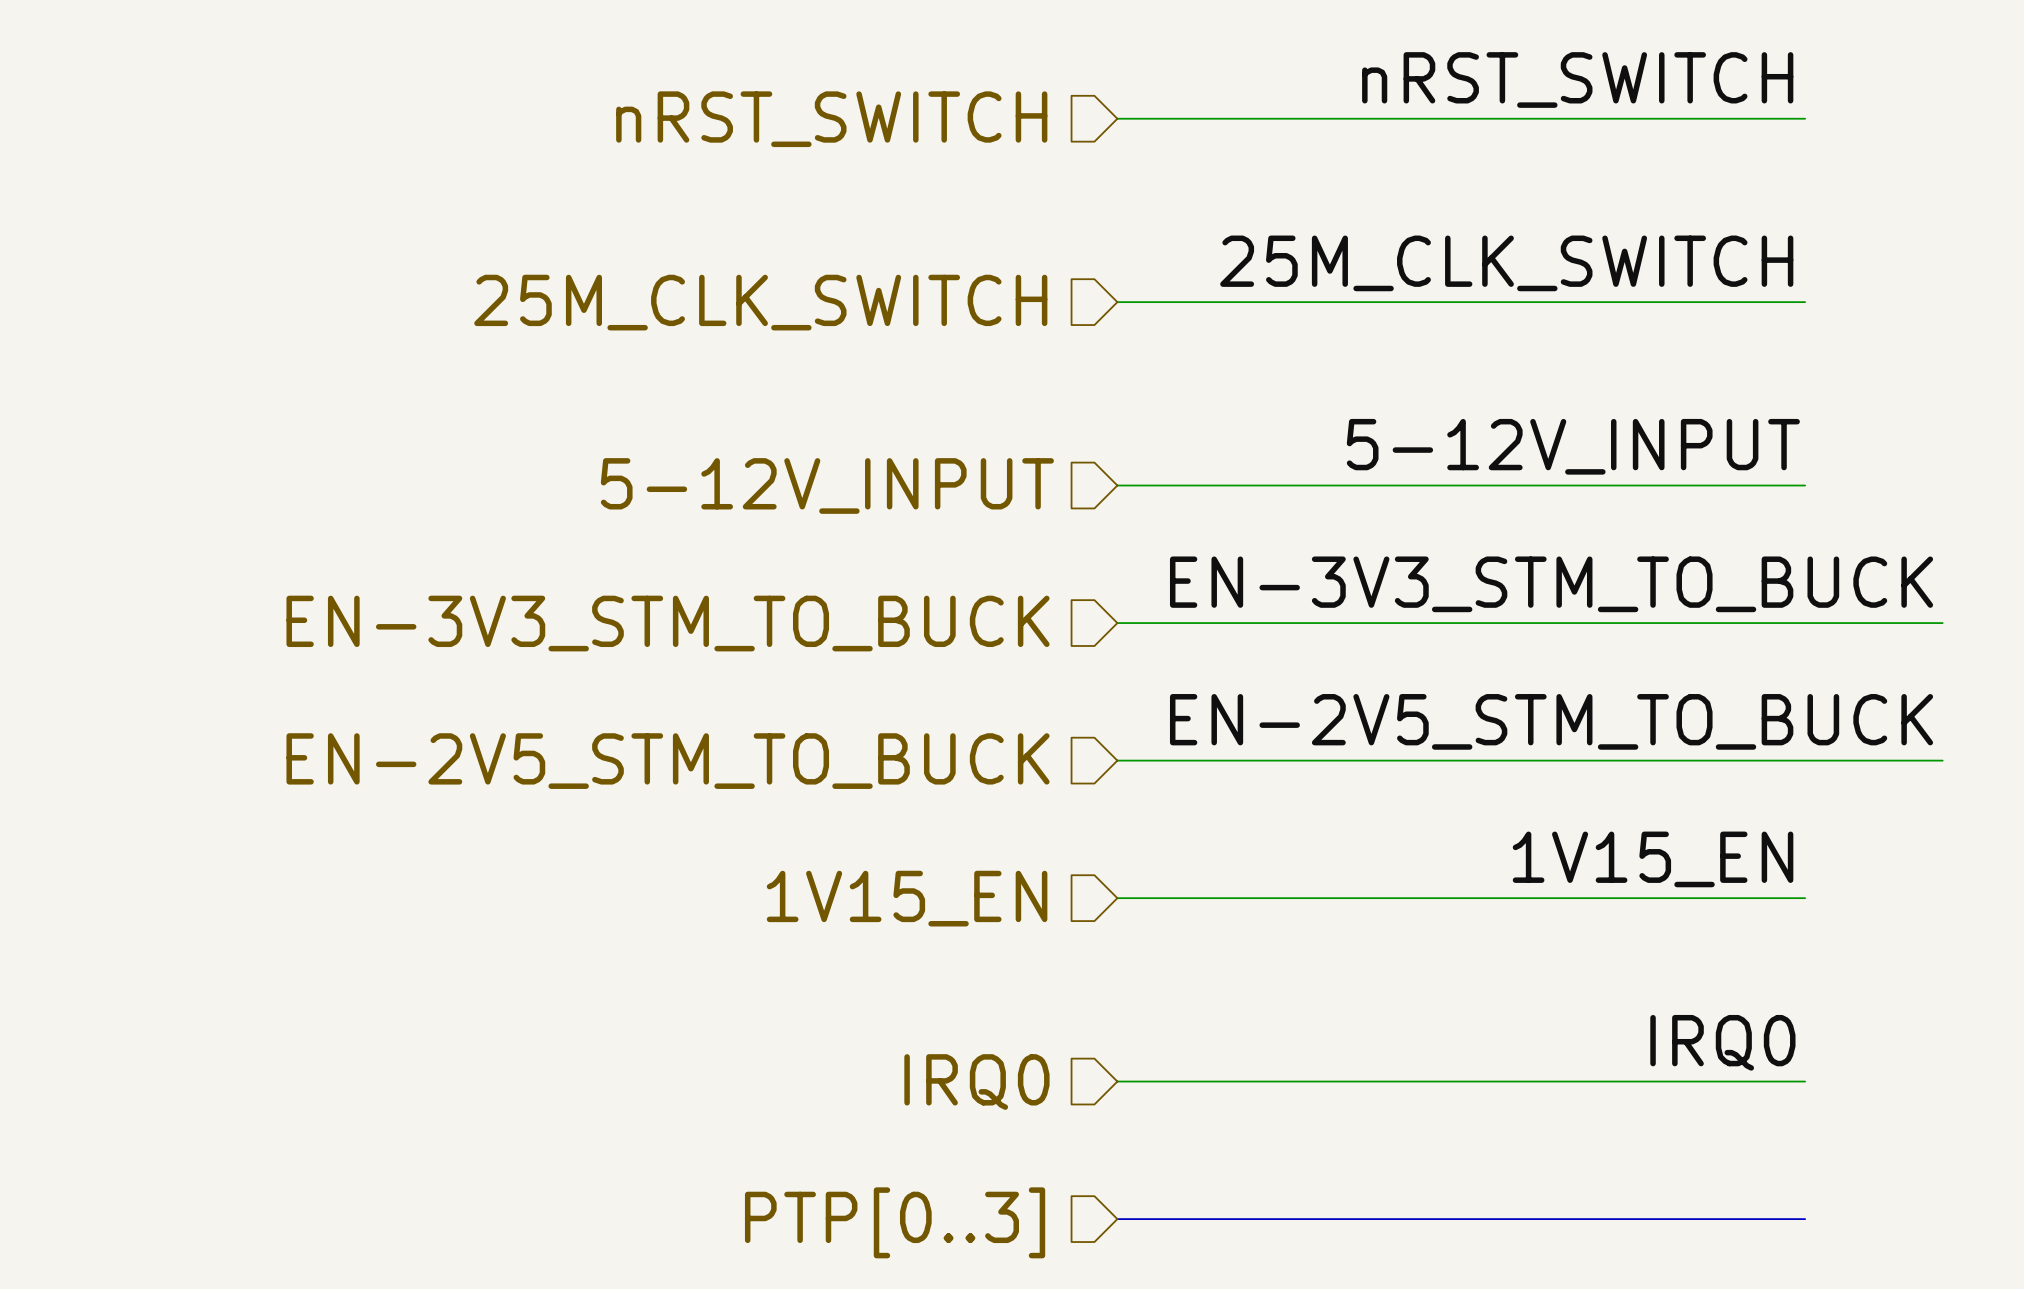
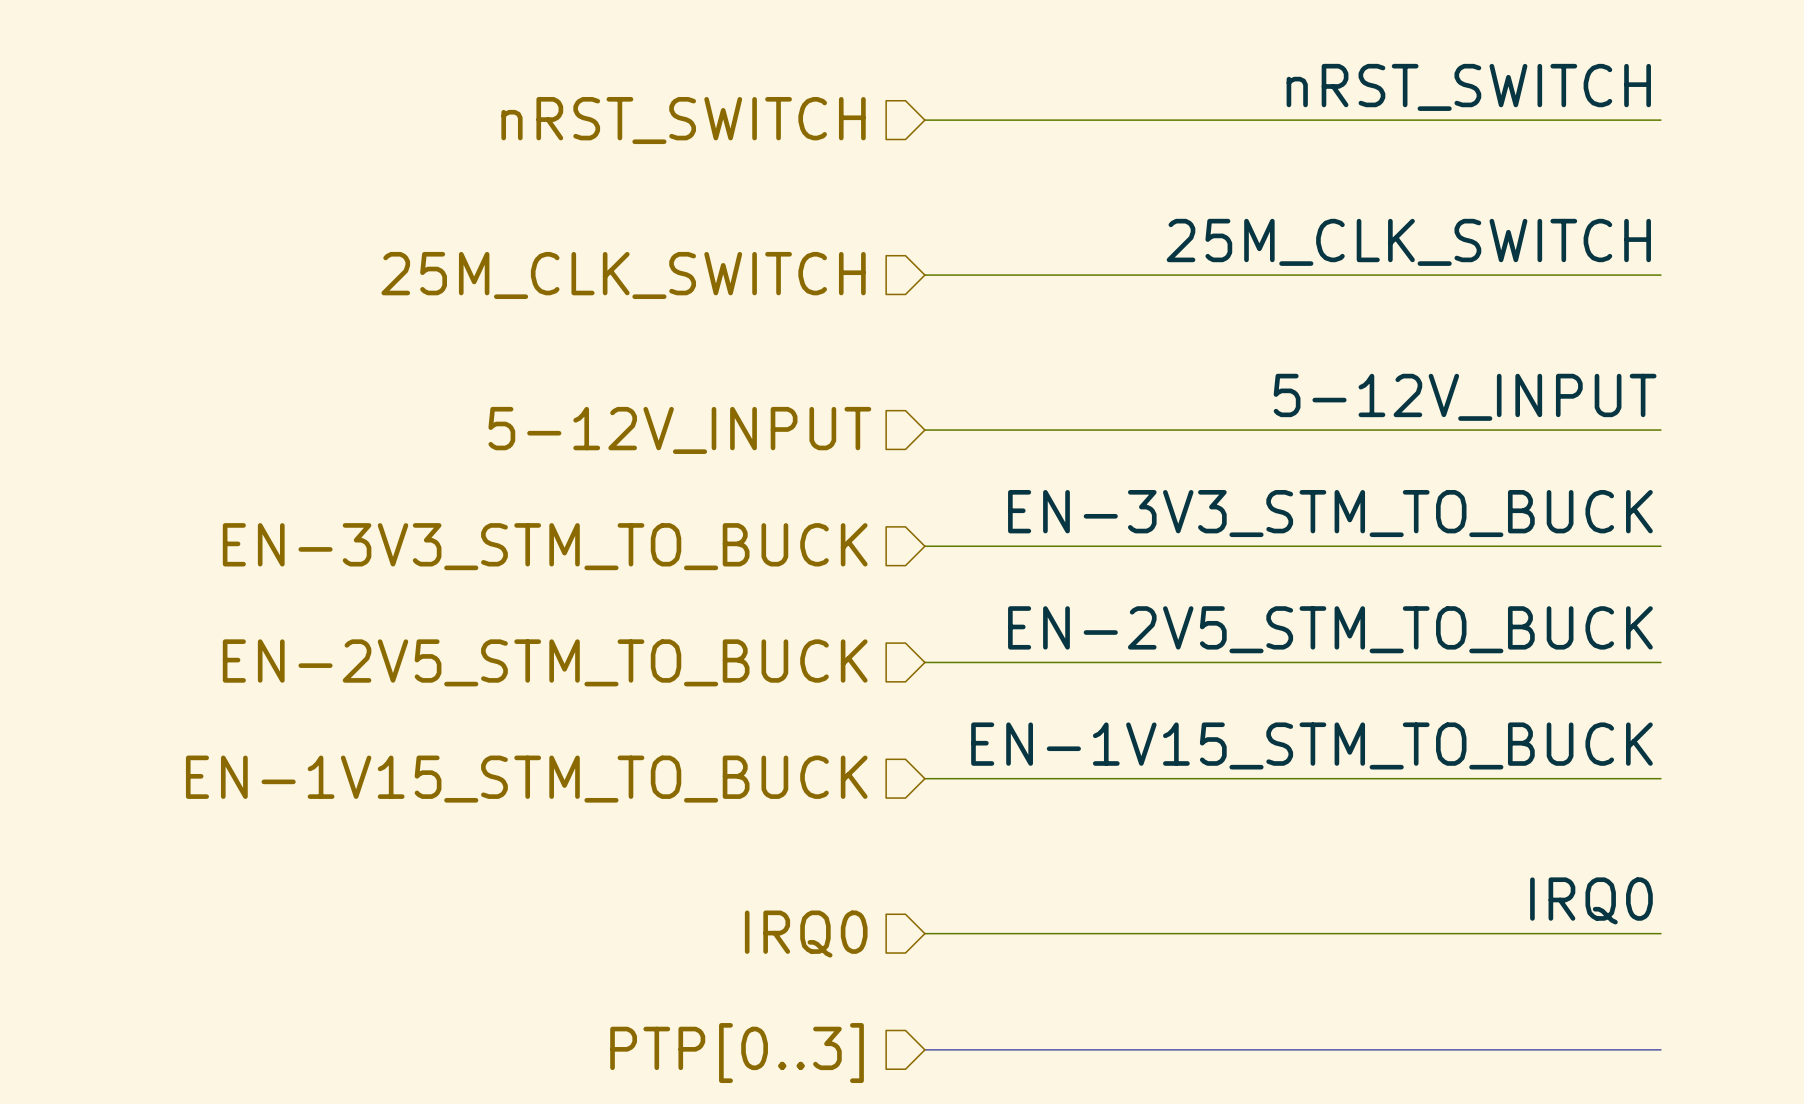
label position: nRST_SWITCH (1577, 80) -> nRST_SWITCH (1468, 87)
wire: none -> (1505, 120) (1660, 120)
label position: 25M_CLK_SWITCH (1506, 263) -> 25M_CLK_SWITCH (1408, 242)
wire: none -> (1505, 275) (1660, 275)
label position: 5-12V_INPUT (1573, 446) -> 5-12V_INPUT (1465, 397)
wire: none -> (1505, 430) (1660, 430)
label position: EN-3V3_STM_TO_BUCK (1551, 584) -> EN-3V3_STM_TO_BUCK (1330, 513)
wire: none -> (1622, 546) (1660, 546)
label position: EN-2V5_STM_TO_BUCK (1551, 721) -> EN-2V5_STM_TO_BUCK (1330, 629)
wire: none -> (1622, 662) (1660, 662)
label: none -> EN-1V15_STM_TO_BUCK (1311, 745)
label: 1V15_EN (1653, 859) -> none
hierarchical label: 1V15_EN (907, 898) -> EN-1V15_STM_TO_BUCK (526, 779)
wire: none -> (1505, 778) (1660, 778)
label position: IRQ0 (1722, 1042) -> IRQ0 (1591, 900)
wire: none -> (1505, 933) (1660, 933)
bus: none -> (1505, 1049) (1660, 1049)

